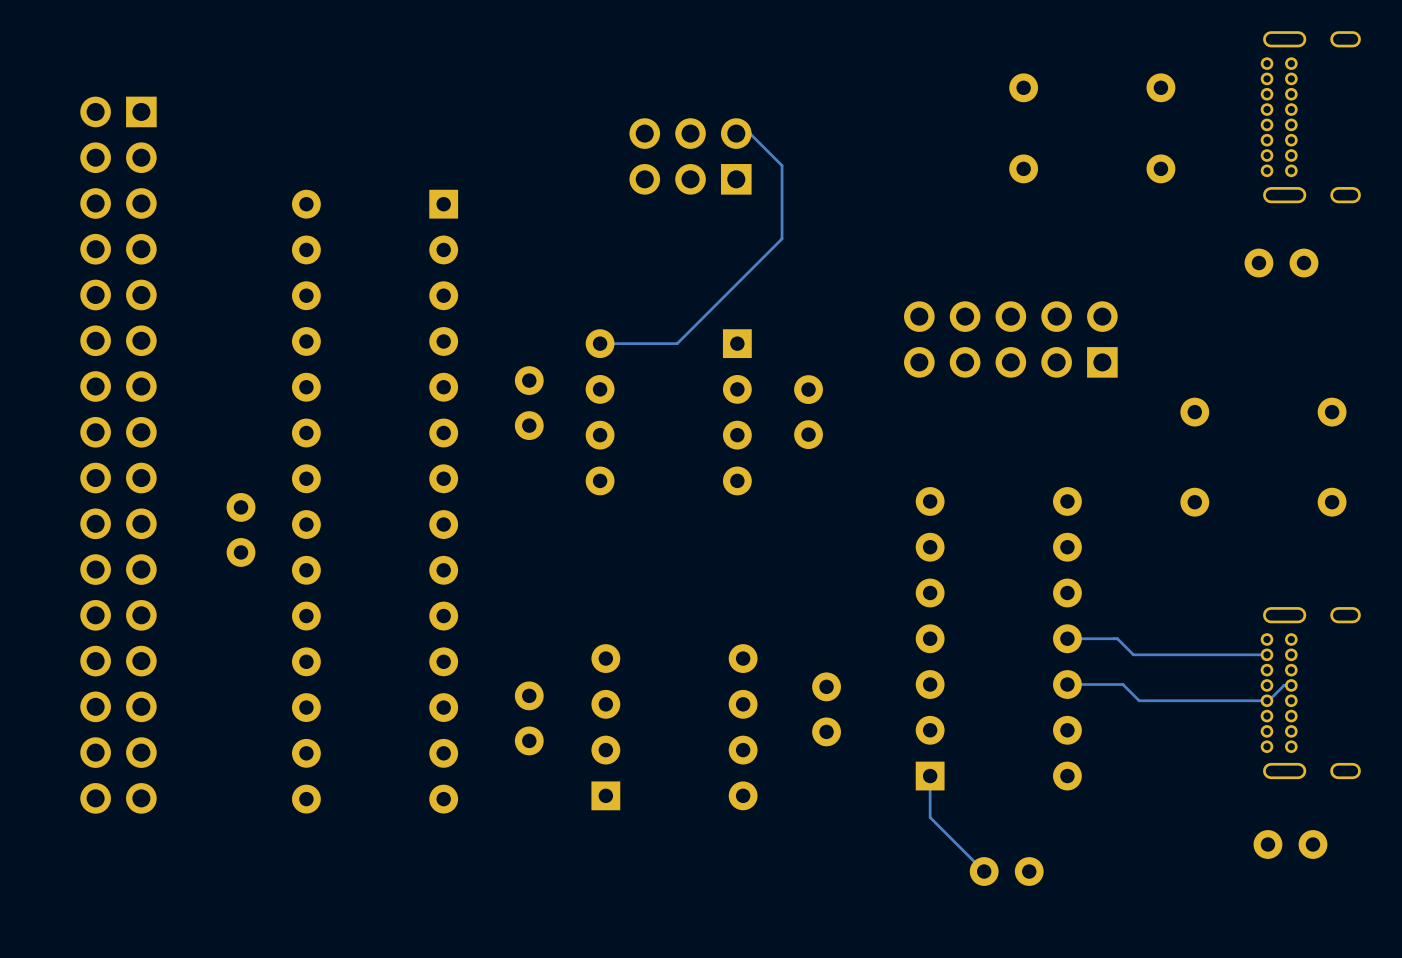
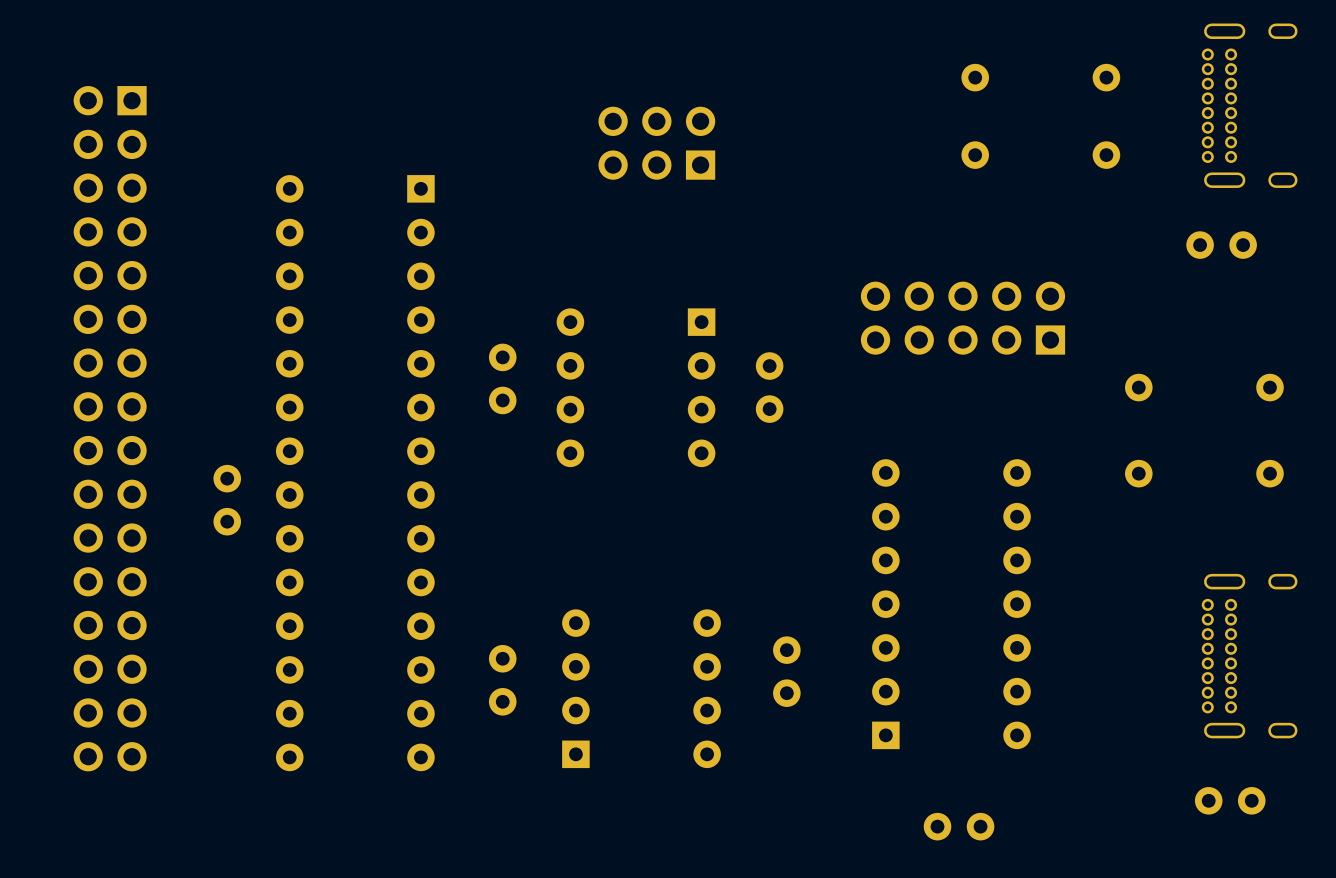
track: (736, 133) (750, 133) (782, 165) (782, 238) (677, 343) (600, 343) -> none
track: (1067, 638) (1117, 638) (1133, 654) (1266, 654) -> none
track: (1067, 684) (1122, 684) (1139, 700) (1268, 700) (1284, 685) (1291, 685) -> none
track: (930, 776) (930, 817) (984, 871) -> none

